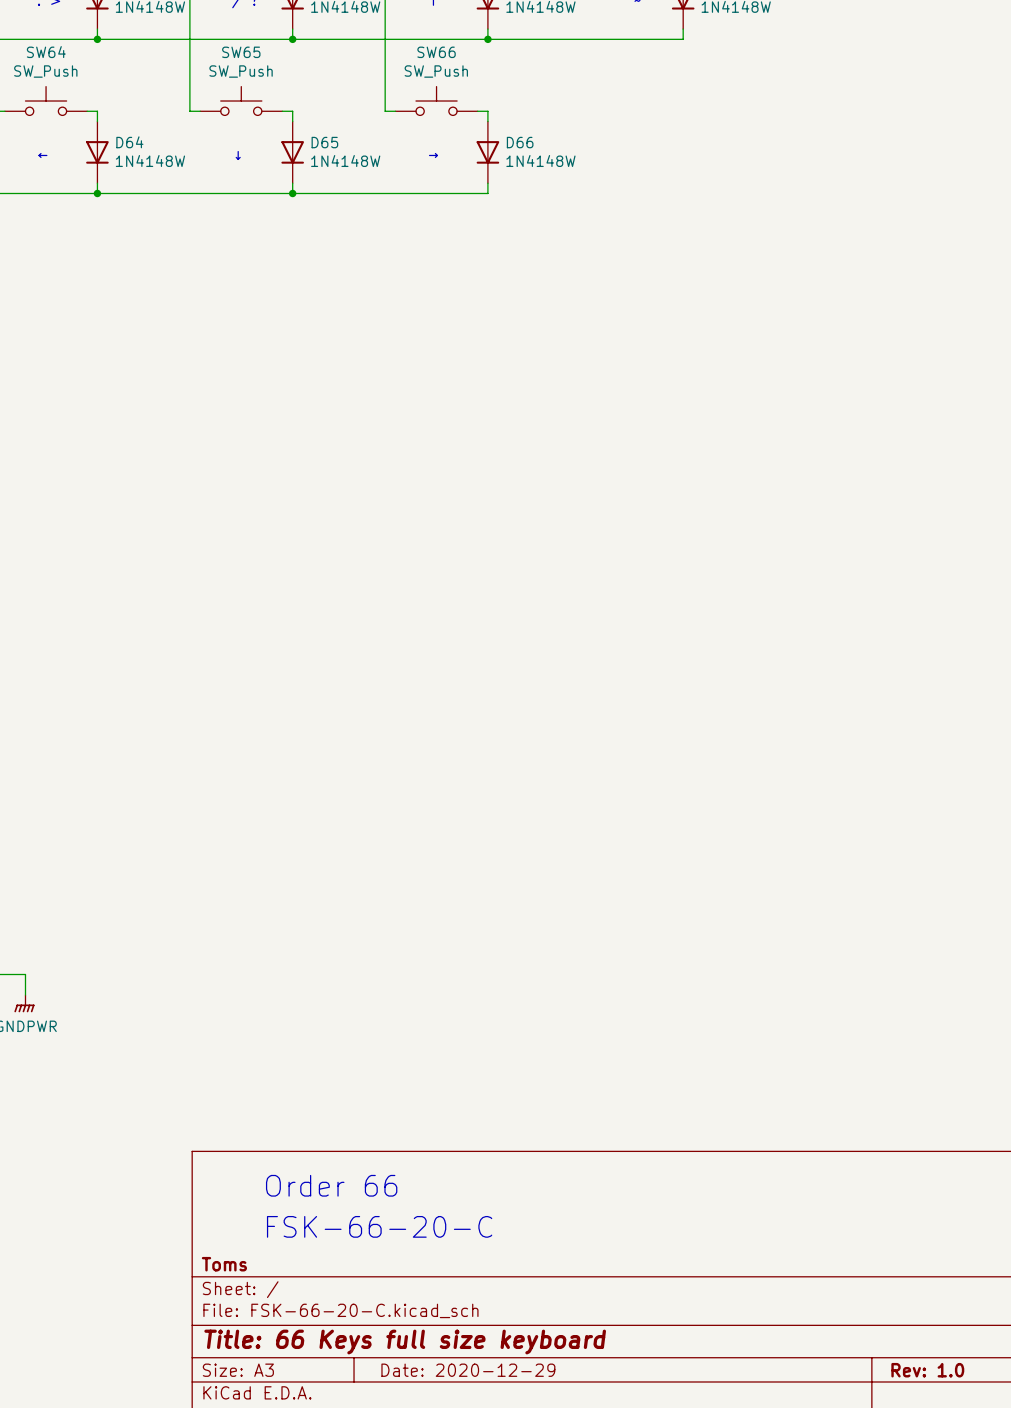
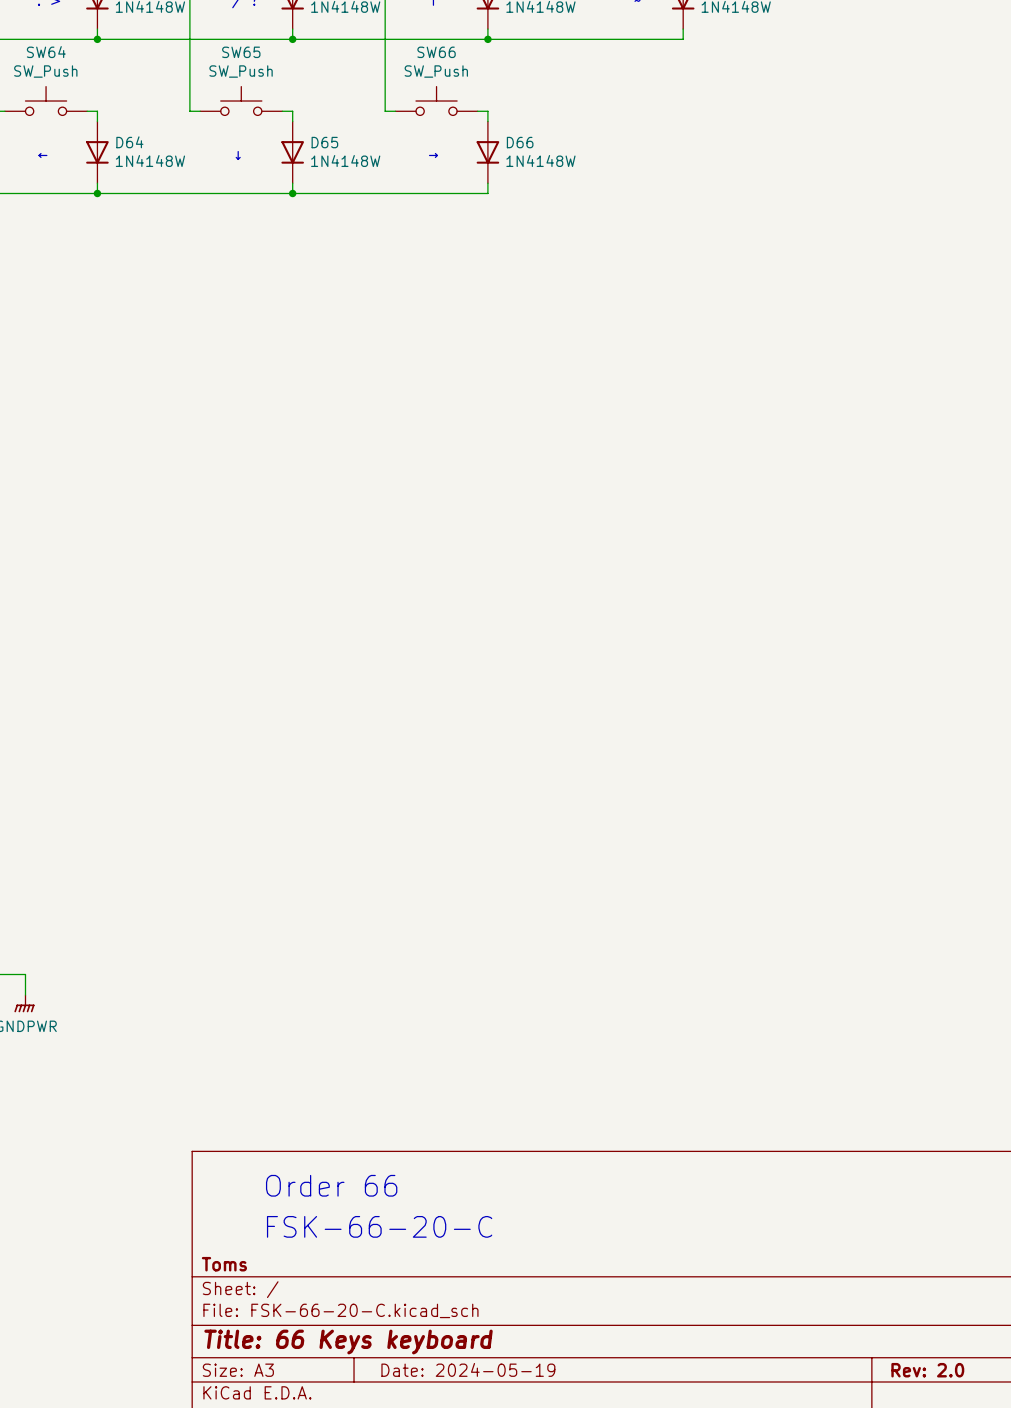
title block: Title: 66 Keys full size keyboard (405, 1342) -> Title: 66 Keys keyboard (348, 1342)
title block: Date: 2020-12-29 (468, 1370) -> Date: 2024-05-19 (468, 1369)
title block: Rev: 1.0 (927, 1370) -> Rev: 2.0 (927, 1370)

